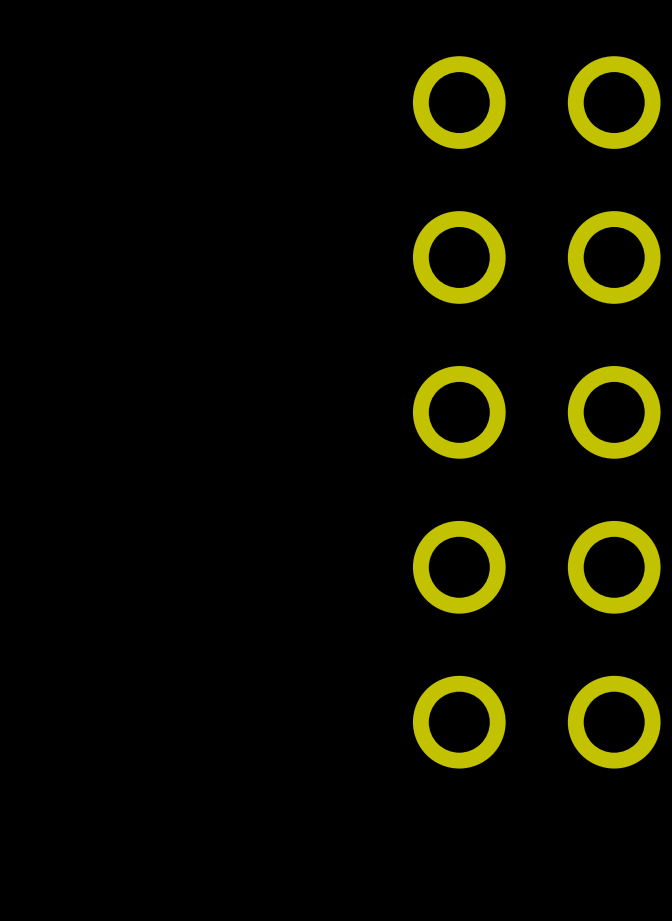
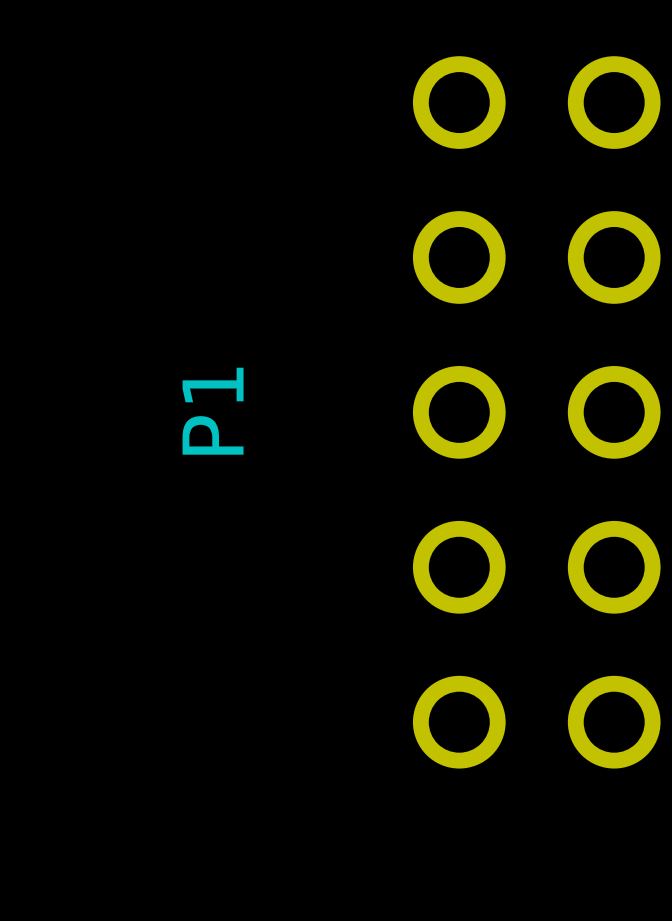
P1 name: none -> P1 (213, 411)

